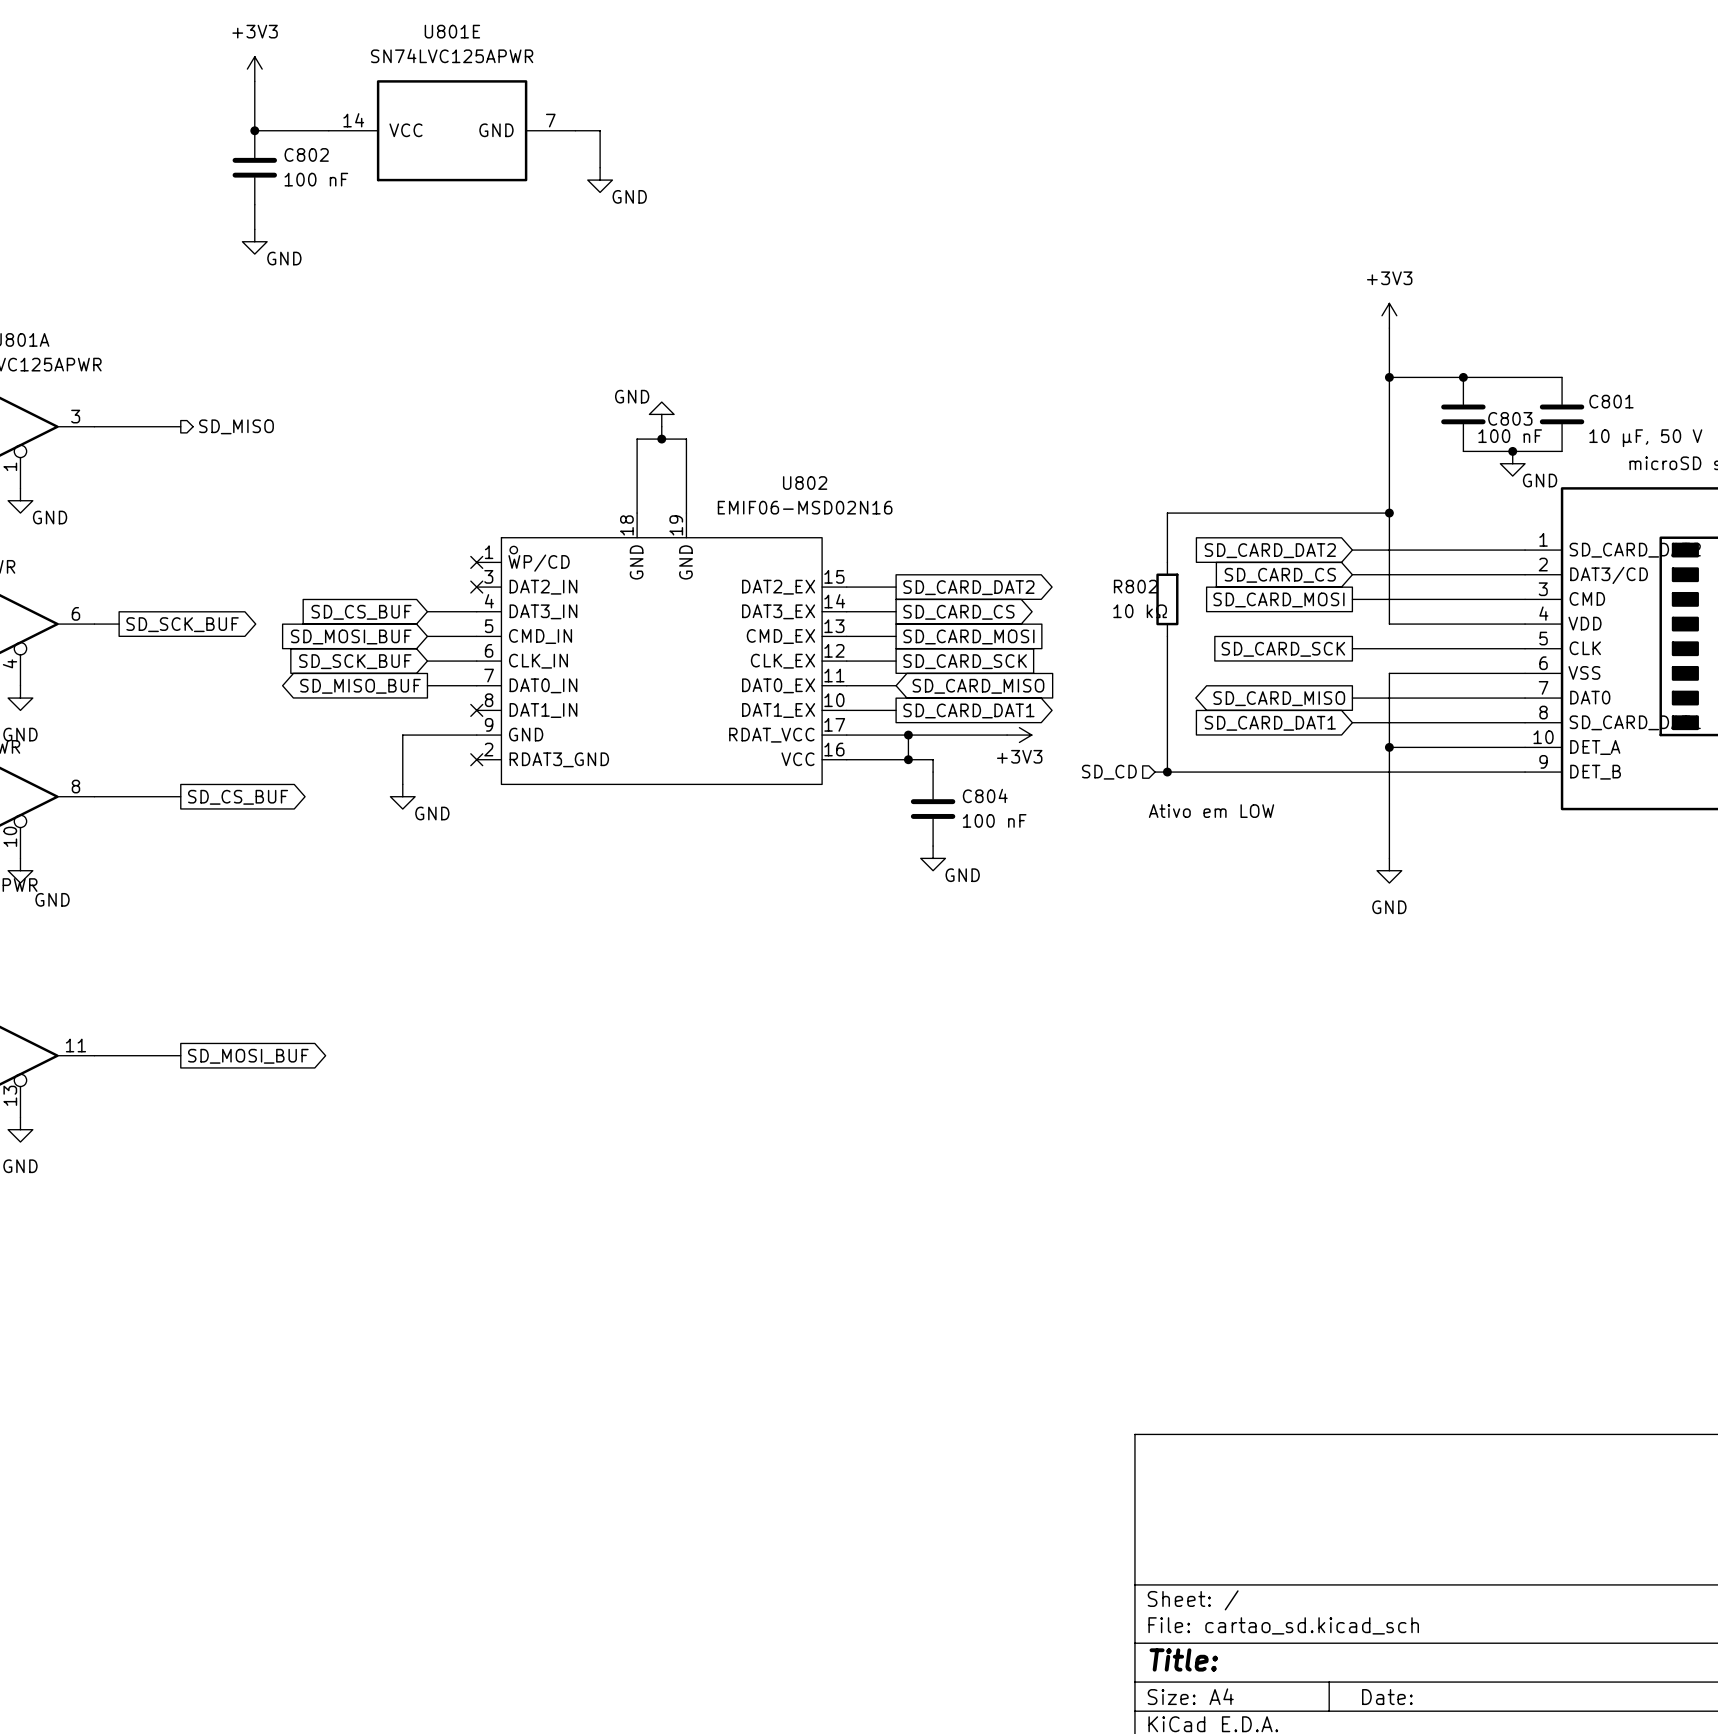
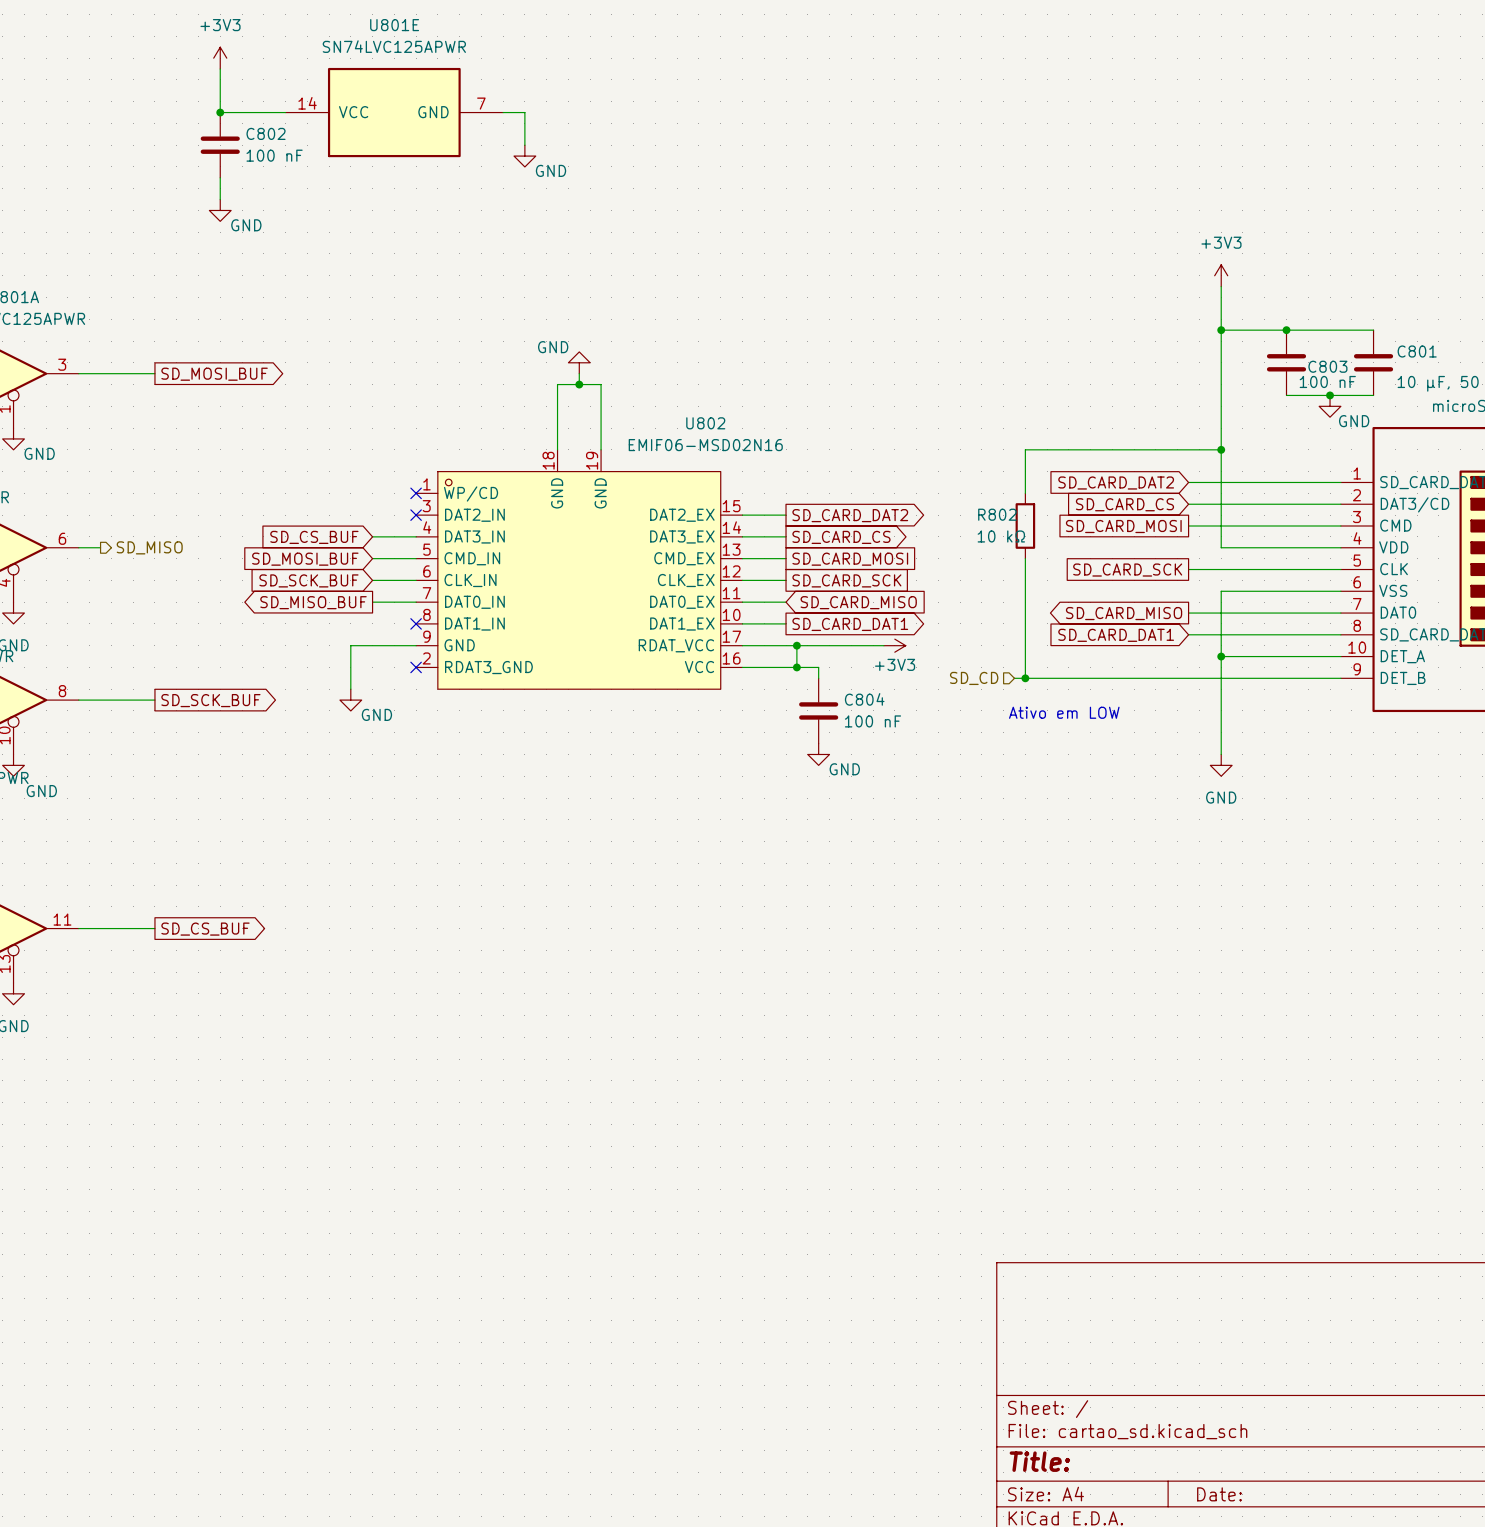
hierarchical label position: SD_MISO (236, 426) -> SD_MISO (149, 547)
global label: none -> SD_MOSI_BUF (214, 374)
global label: SD_SCK_BUF (182, 624) -> none
global label: SD_CS_BUF (238, 797) -> SD_SCK_BUF (210, 700)
global label: SD_MOSI_BUF (248, 1056) -> SD_CS_BUF (205, 929)

